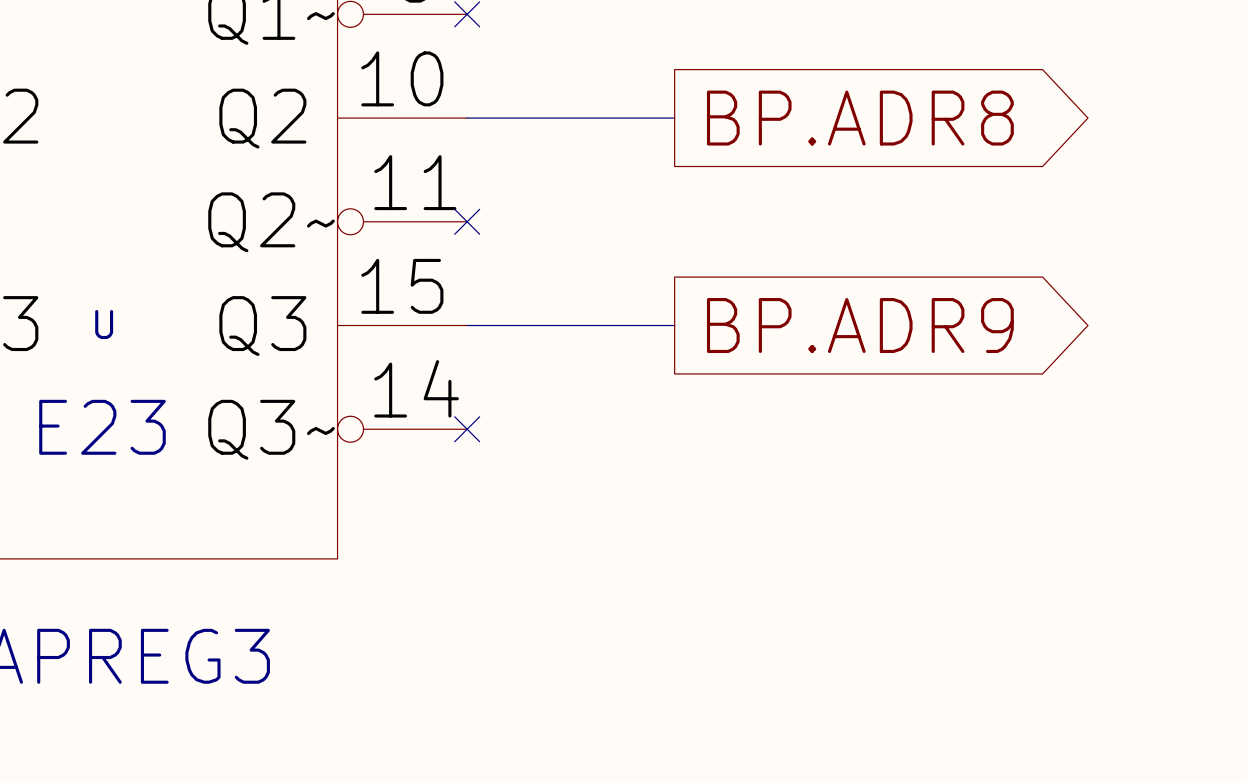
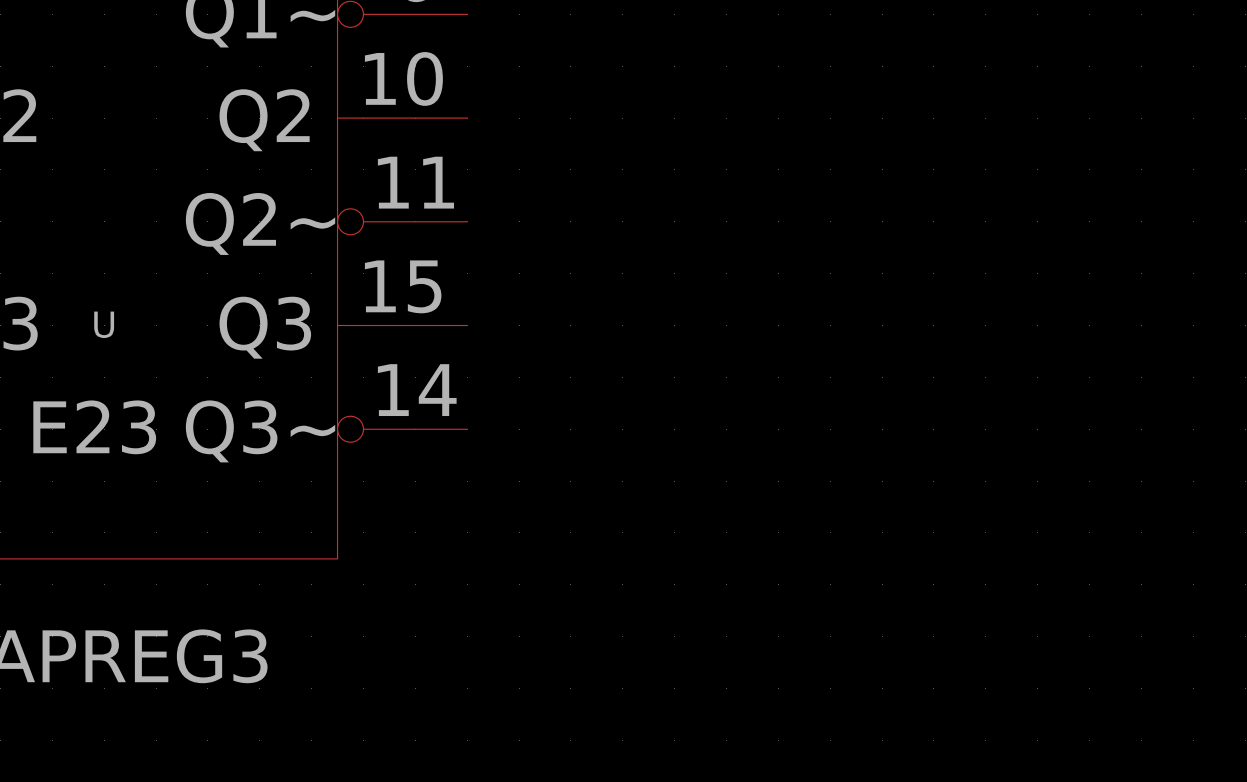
no-connect mark: (467, 14) -> none
wire: (467, 118) (674, 118) -> none
global label: BP.ADR8 (860, 118) -> none
no-connect mark: (467, 221) -> none
wire: (467, 325) (674, 325) -> none
global label: BP.ADR9 (860, 325) -> none
no-connect mark: (467, 429) -> none

